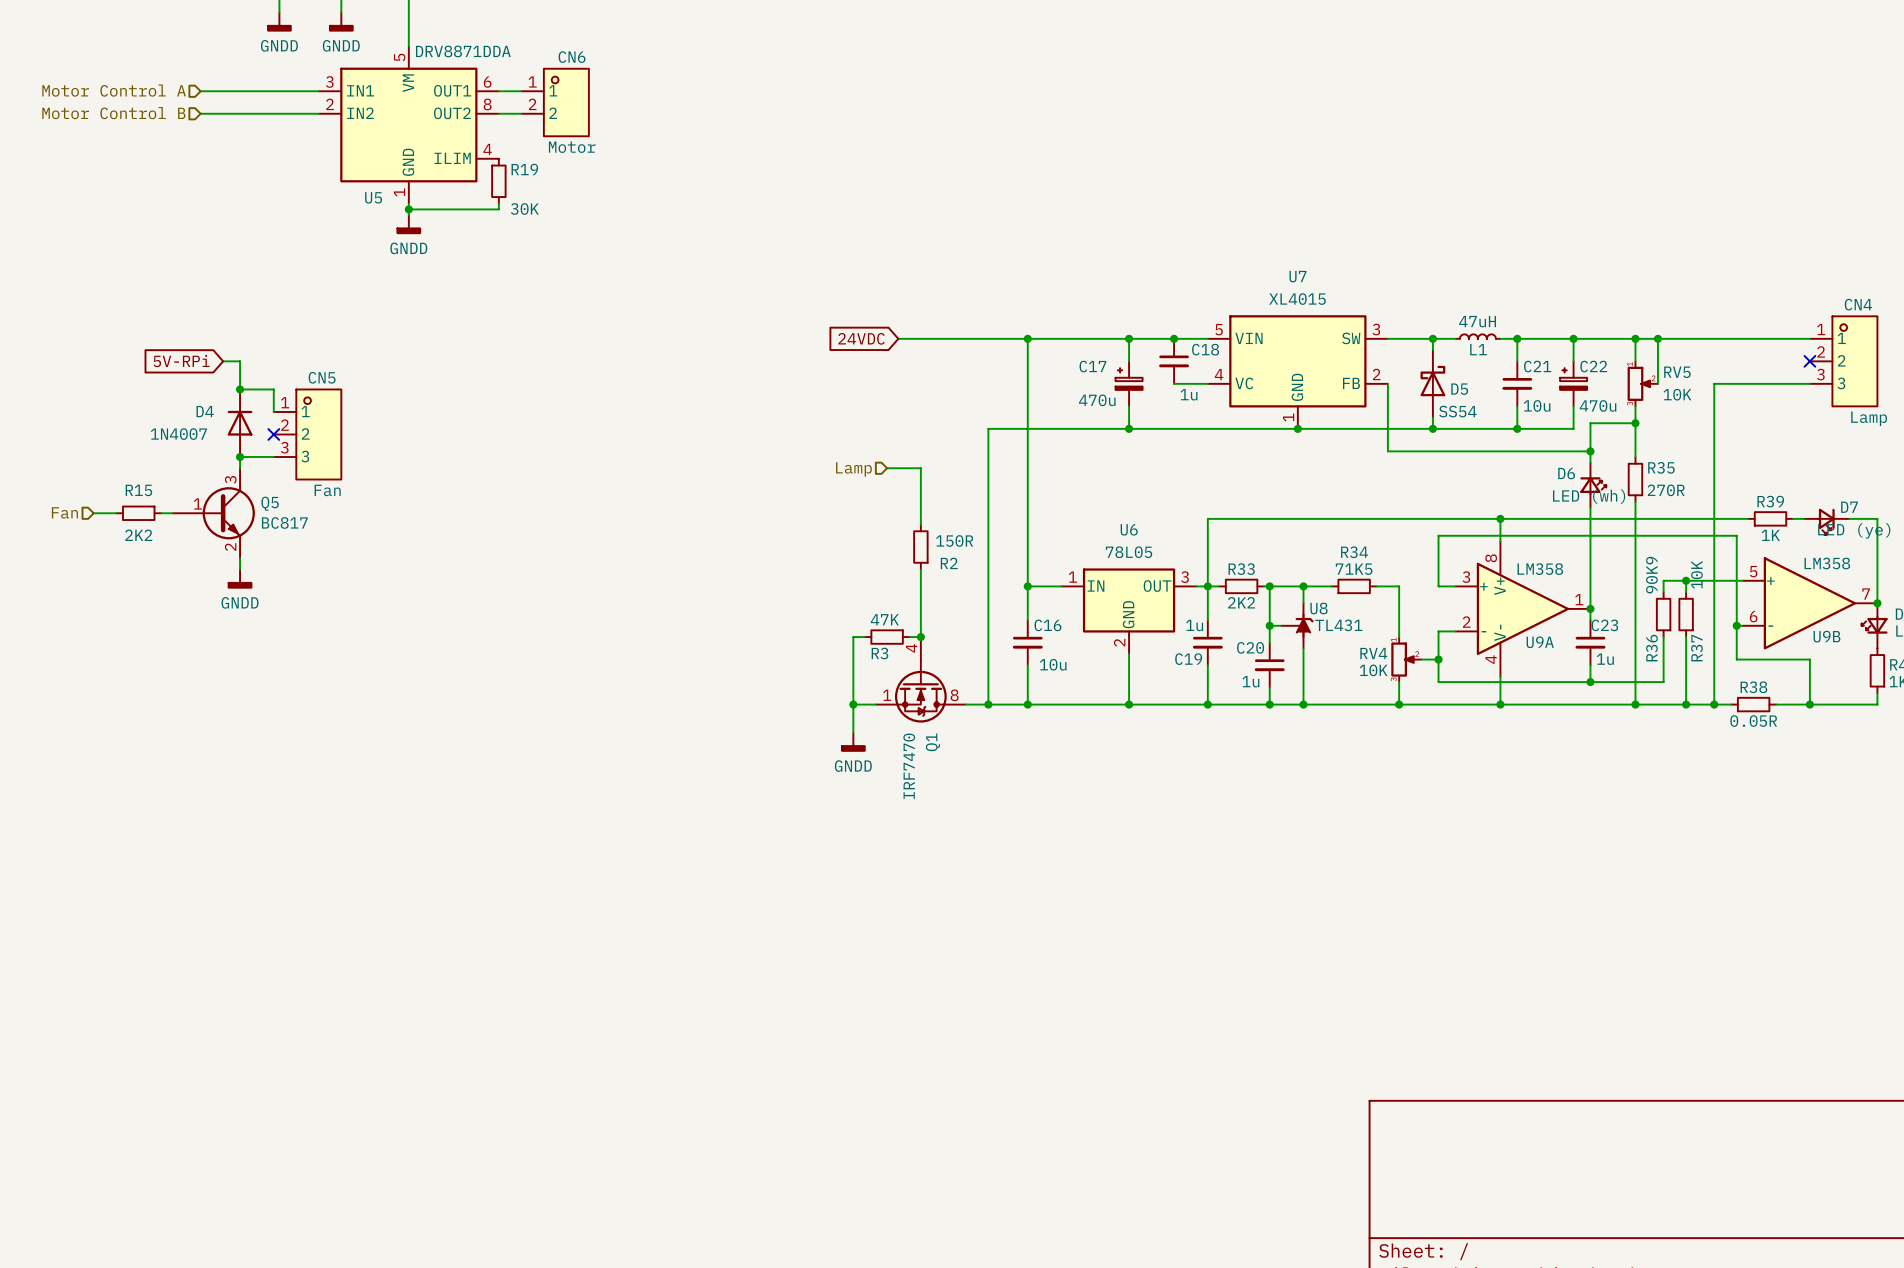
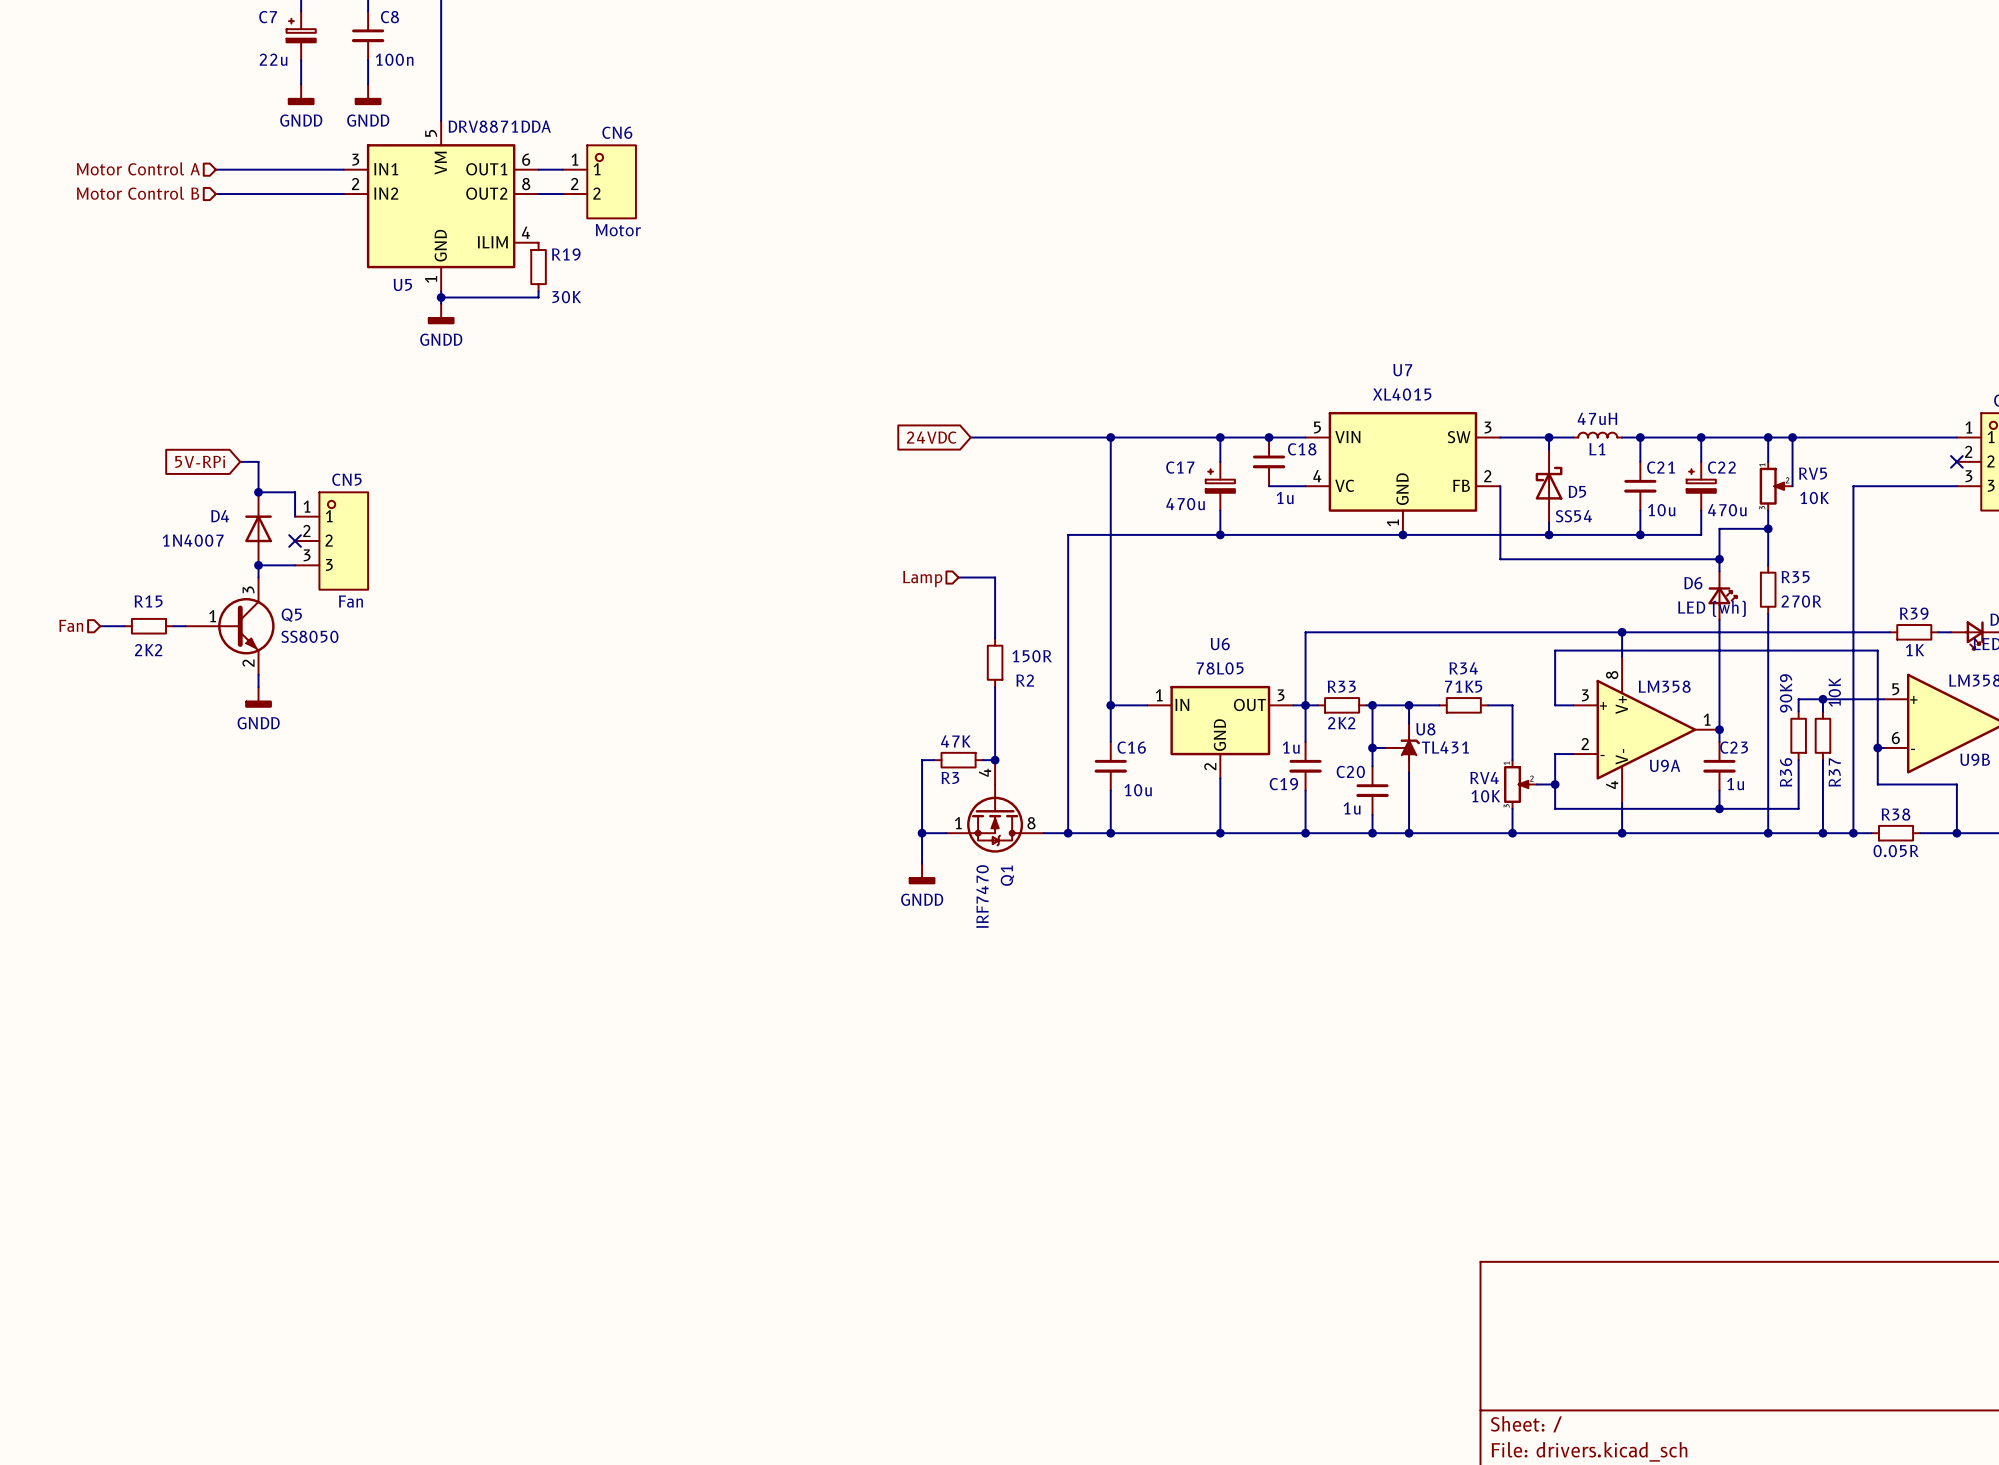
Q5 value: BC817 (284, 522) -> SS8050 (309, 636)

